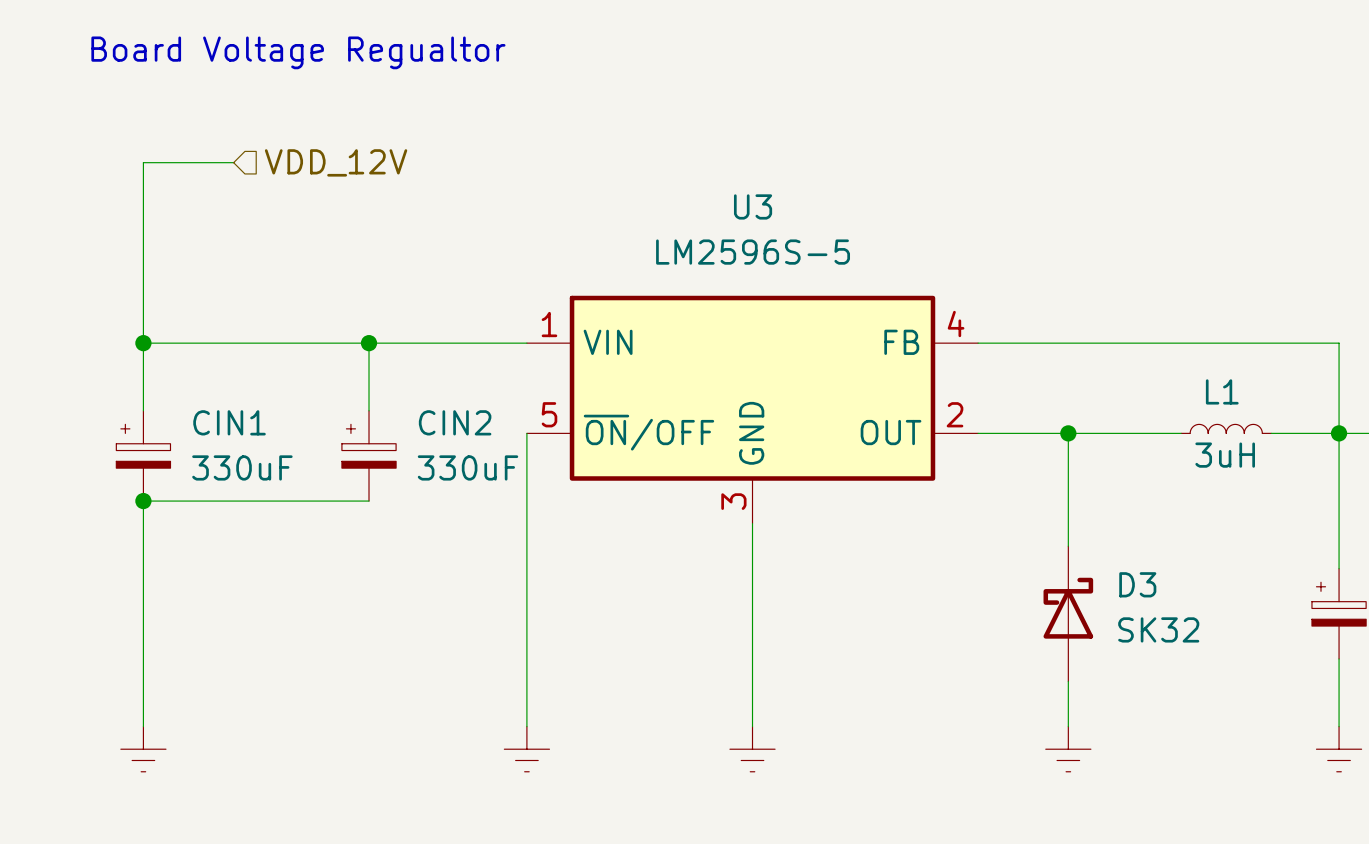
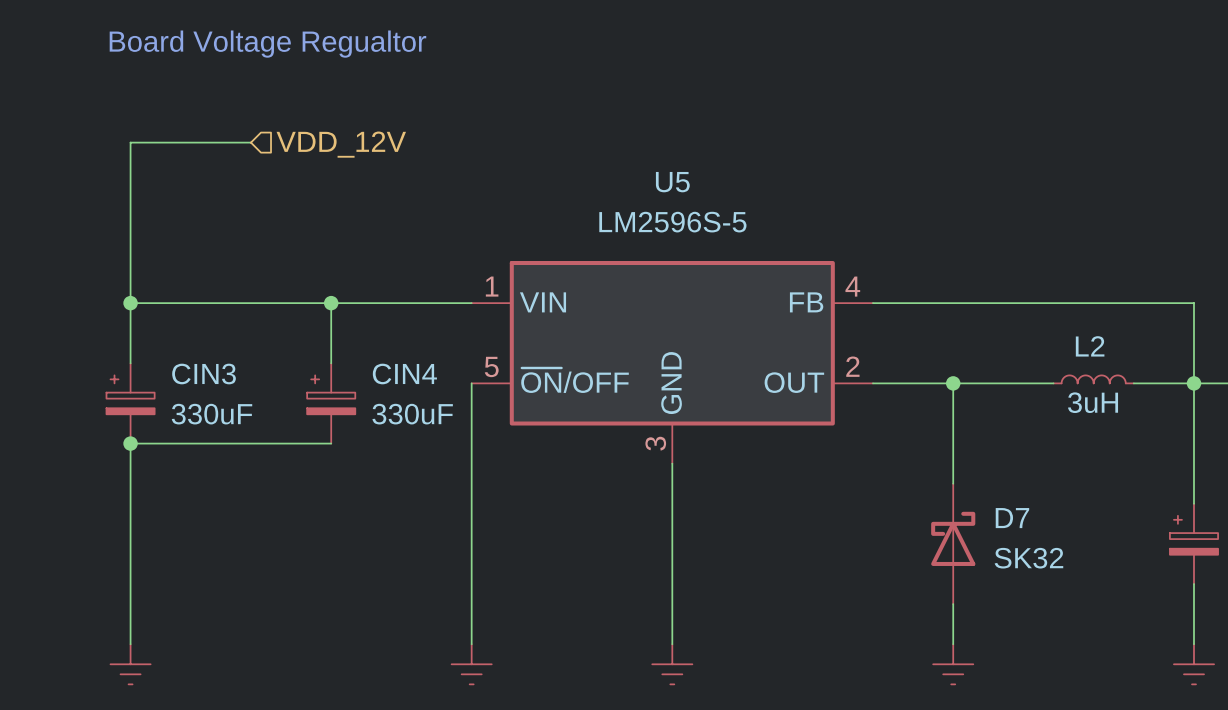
wire: none -> (210, 142) (250, 142)
hierarchical label position: VDD_12V (336, 162) -> VDD_12V (341, 144)
U3 name: U3 (753, 206) -> U5 (672, 182)
L1 name: L1 (1222, 391) -> L2 (1090, 346)
CIN1 name: CIN1 (229, 422) -> CIN3 (204, 374)
CIN2 name: CIN2 (455, 422) -> CIN4 (404, 374)
D3 name: D3 (1137, 584) -> D7 (1012, 518)

